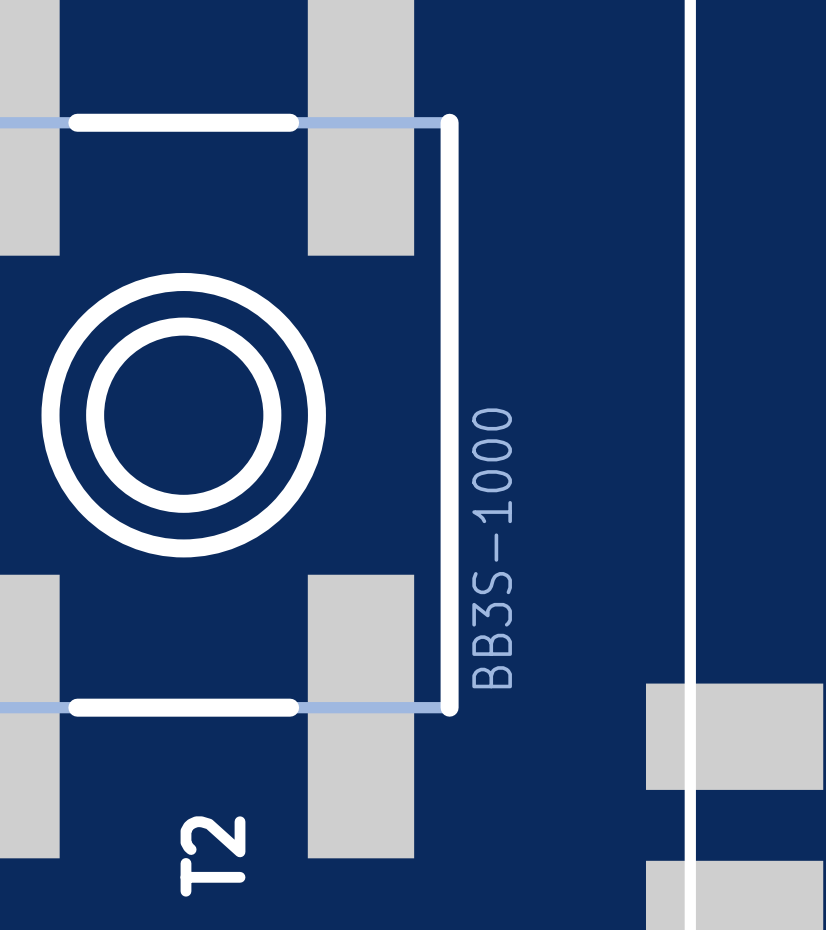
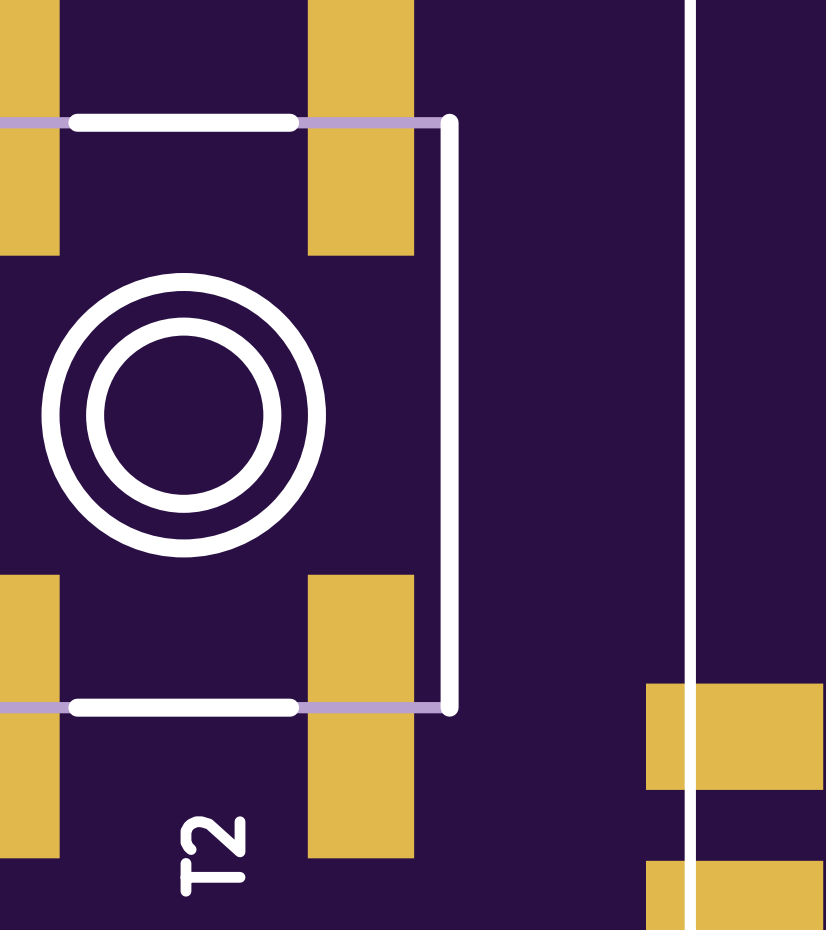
part value: BB3S-1000 (492, 548) -> none

